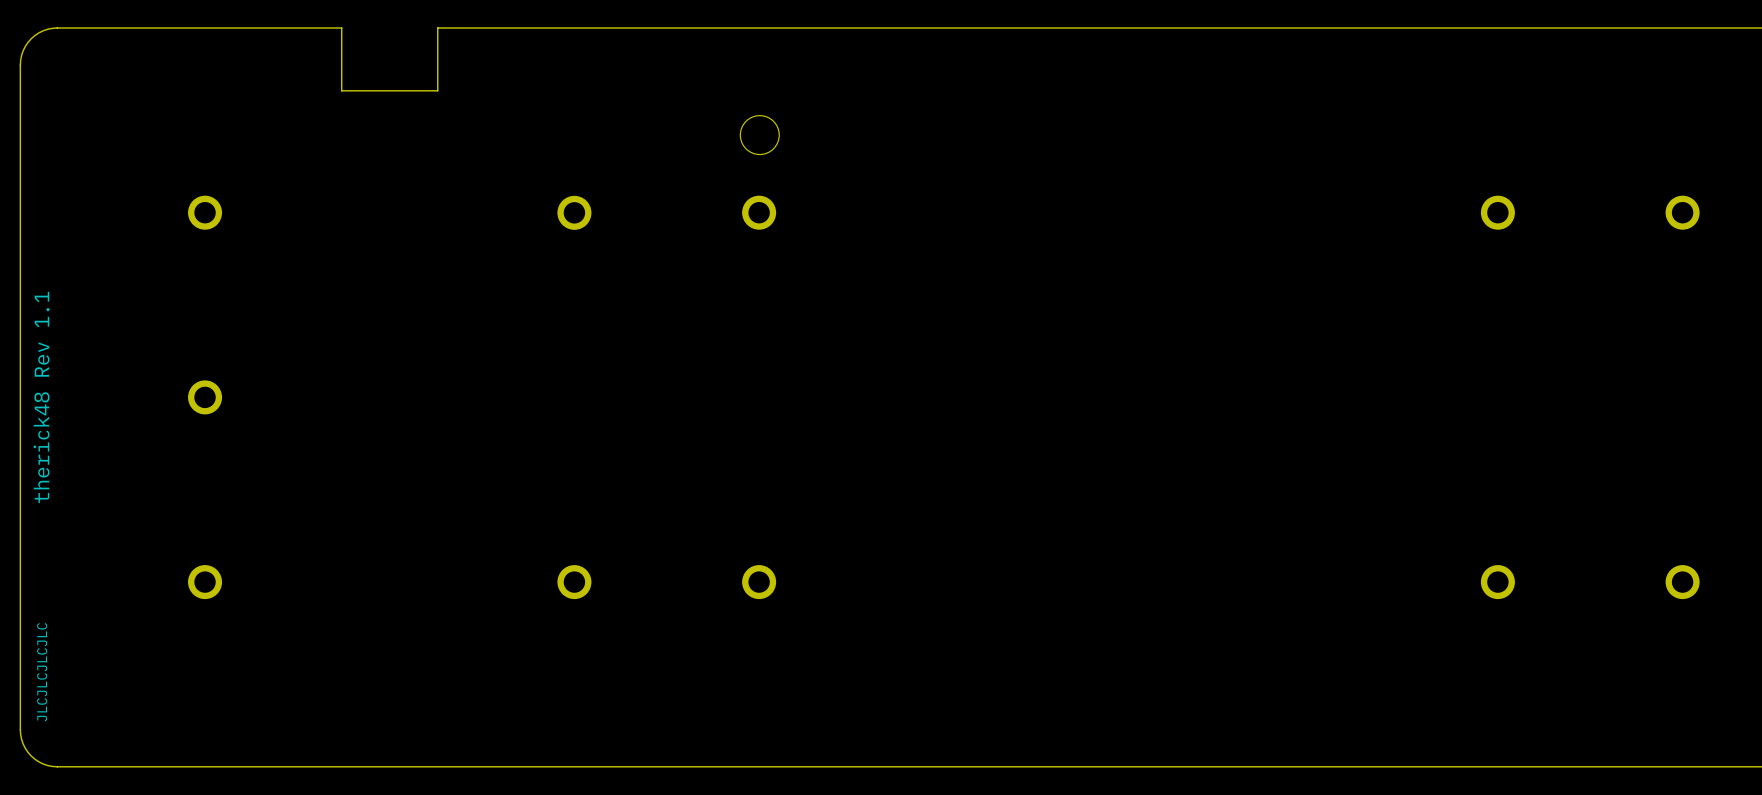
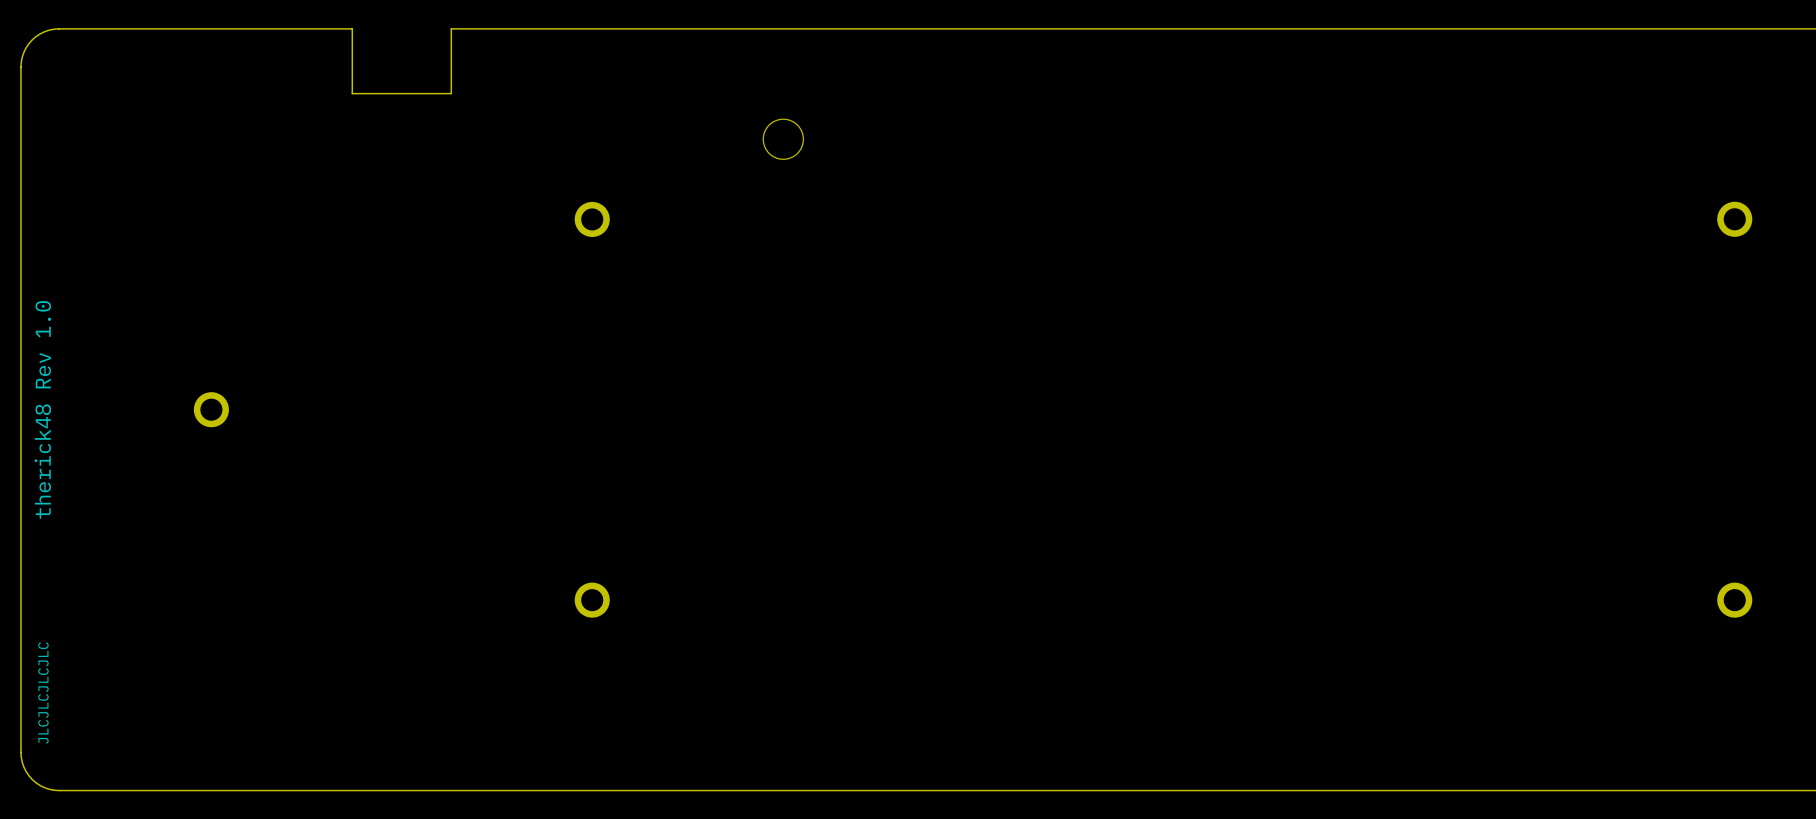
part: (205, 212) -> none
part: (759, 212) -> none
part: (1497, 212) -> none
text: therick48 Rev 1.1 (41, 397) -> therick48 Rev 1.0 (42, 409)
part: (205, 582) -> none
part: (759, 582) -> none
part: (1497, 582) -> none

